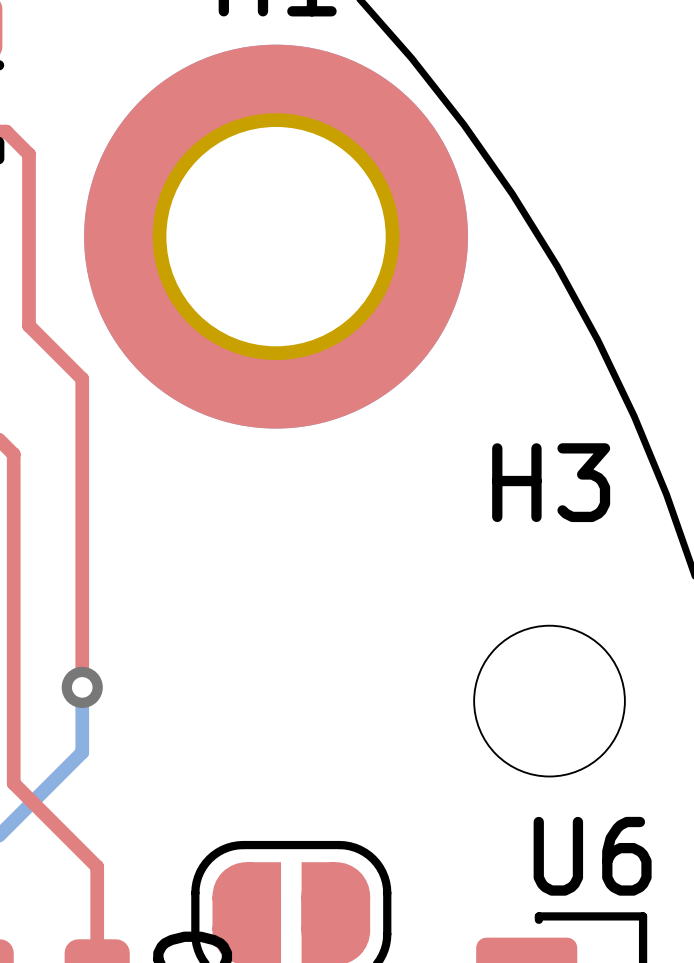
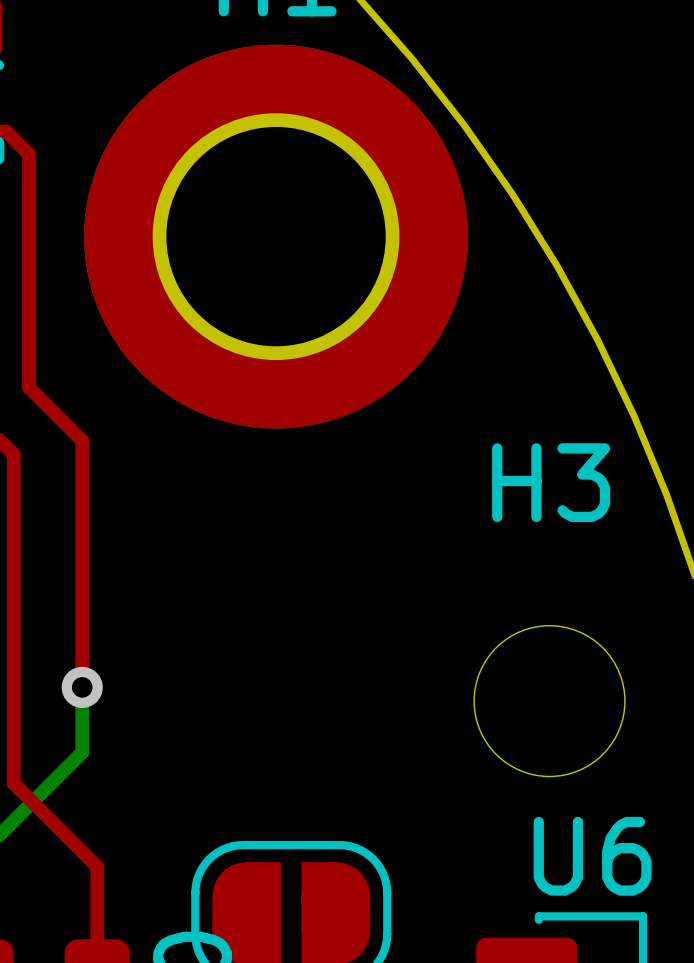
top track: (28, 325) (82, 378) (82, 440) -> (28, 325) (28, 387) (82, 440)

